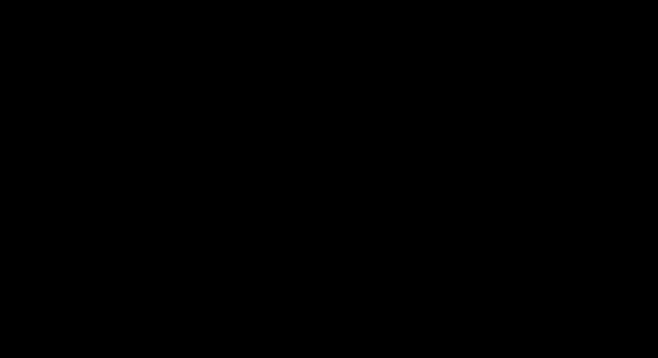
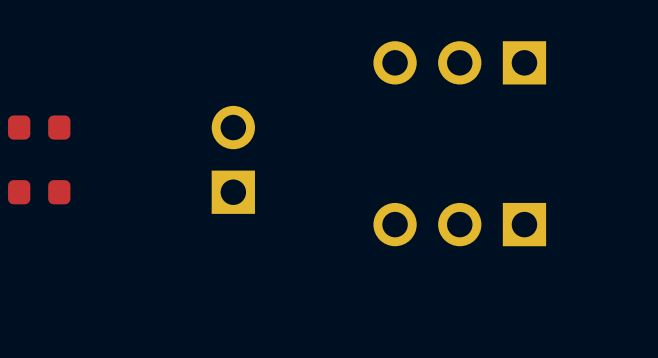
part: none -> (459, 62)
part: none -> (39, 127)
part: none -> (233, 159)
part: none -> (39, 192)
part: none -> (459, 224)

